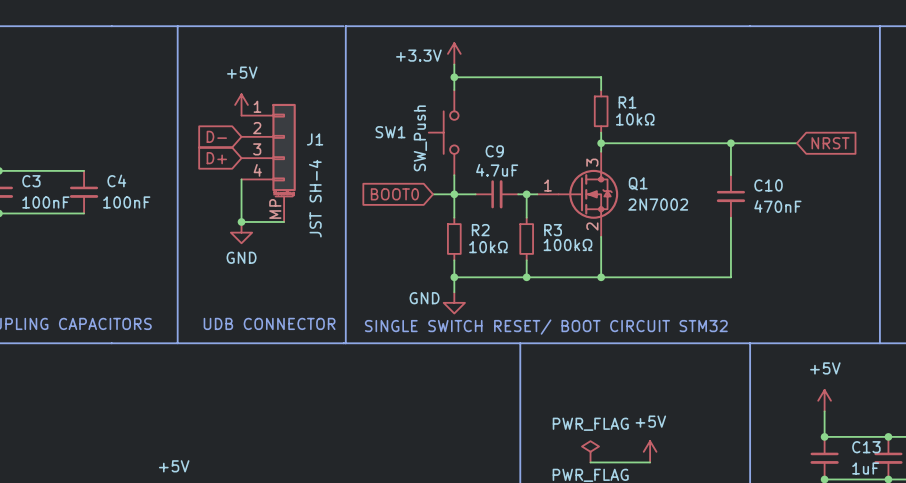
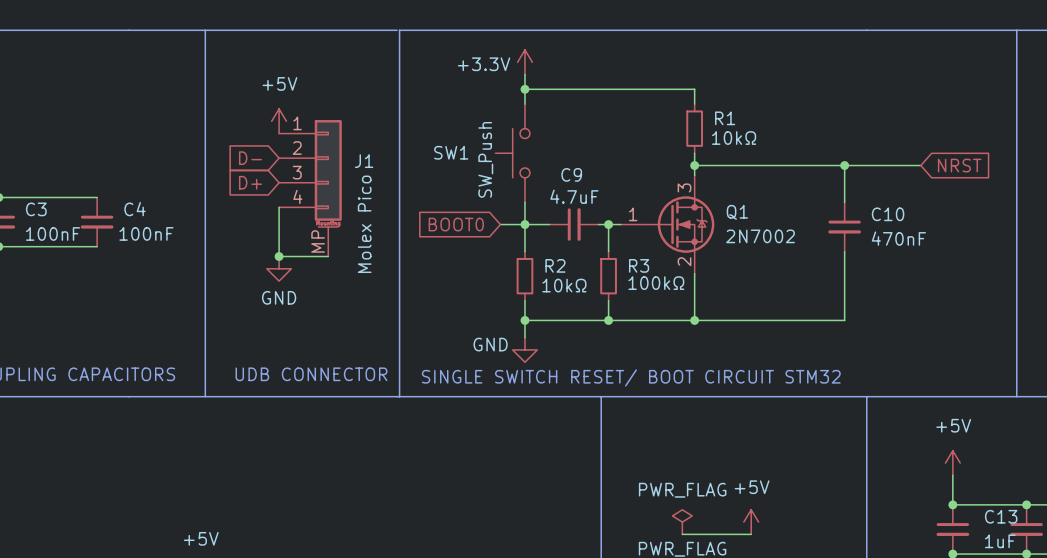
J1 value: JST SH-4 (315, 198) -> Molex Pico (364, 224)

